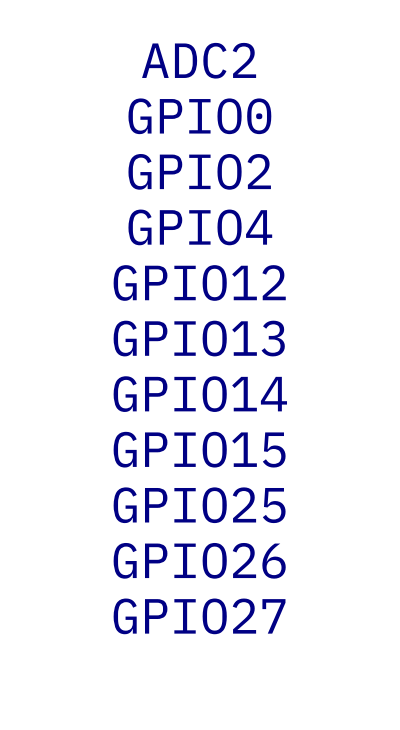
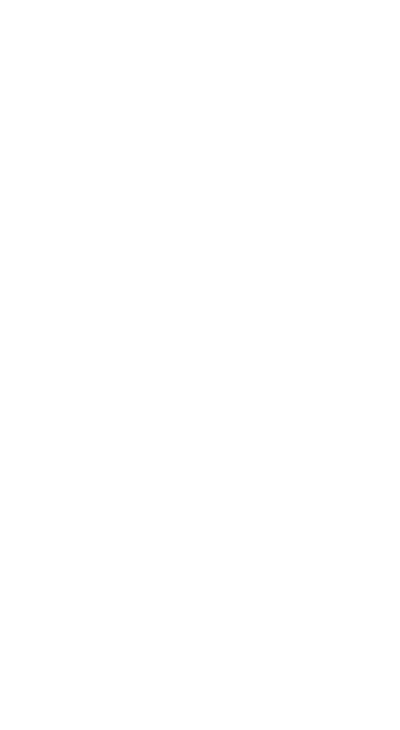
text: ADC2 (199, 60) -> none
text: GPIO0 (199, 116) -> none
text: GPIO2 (199, 171) -> none
text: GPIO4 (200, 227) -> none
text: GPIO12 (199, 282) -> none
text: GPIO13 (199, 338) -> none
text: GPIO14 (200, 394) -> none
text: GPIO15 (199, 449) -> none
text: GPIO25 (199, 505) -> none
text: GPIO26 (199, 560) -> none
text: GPIO27 (199, 616) -> none

